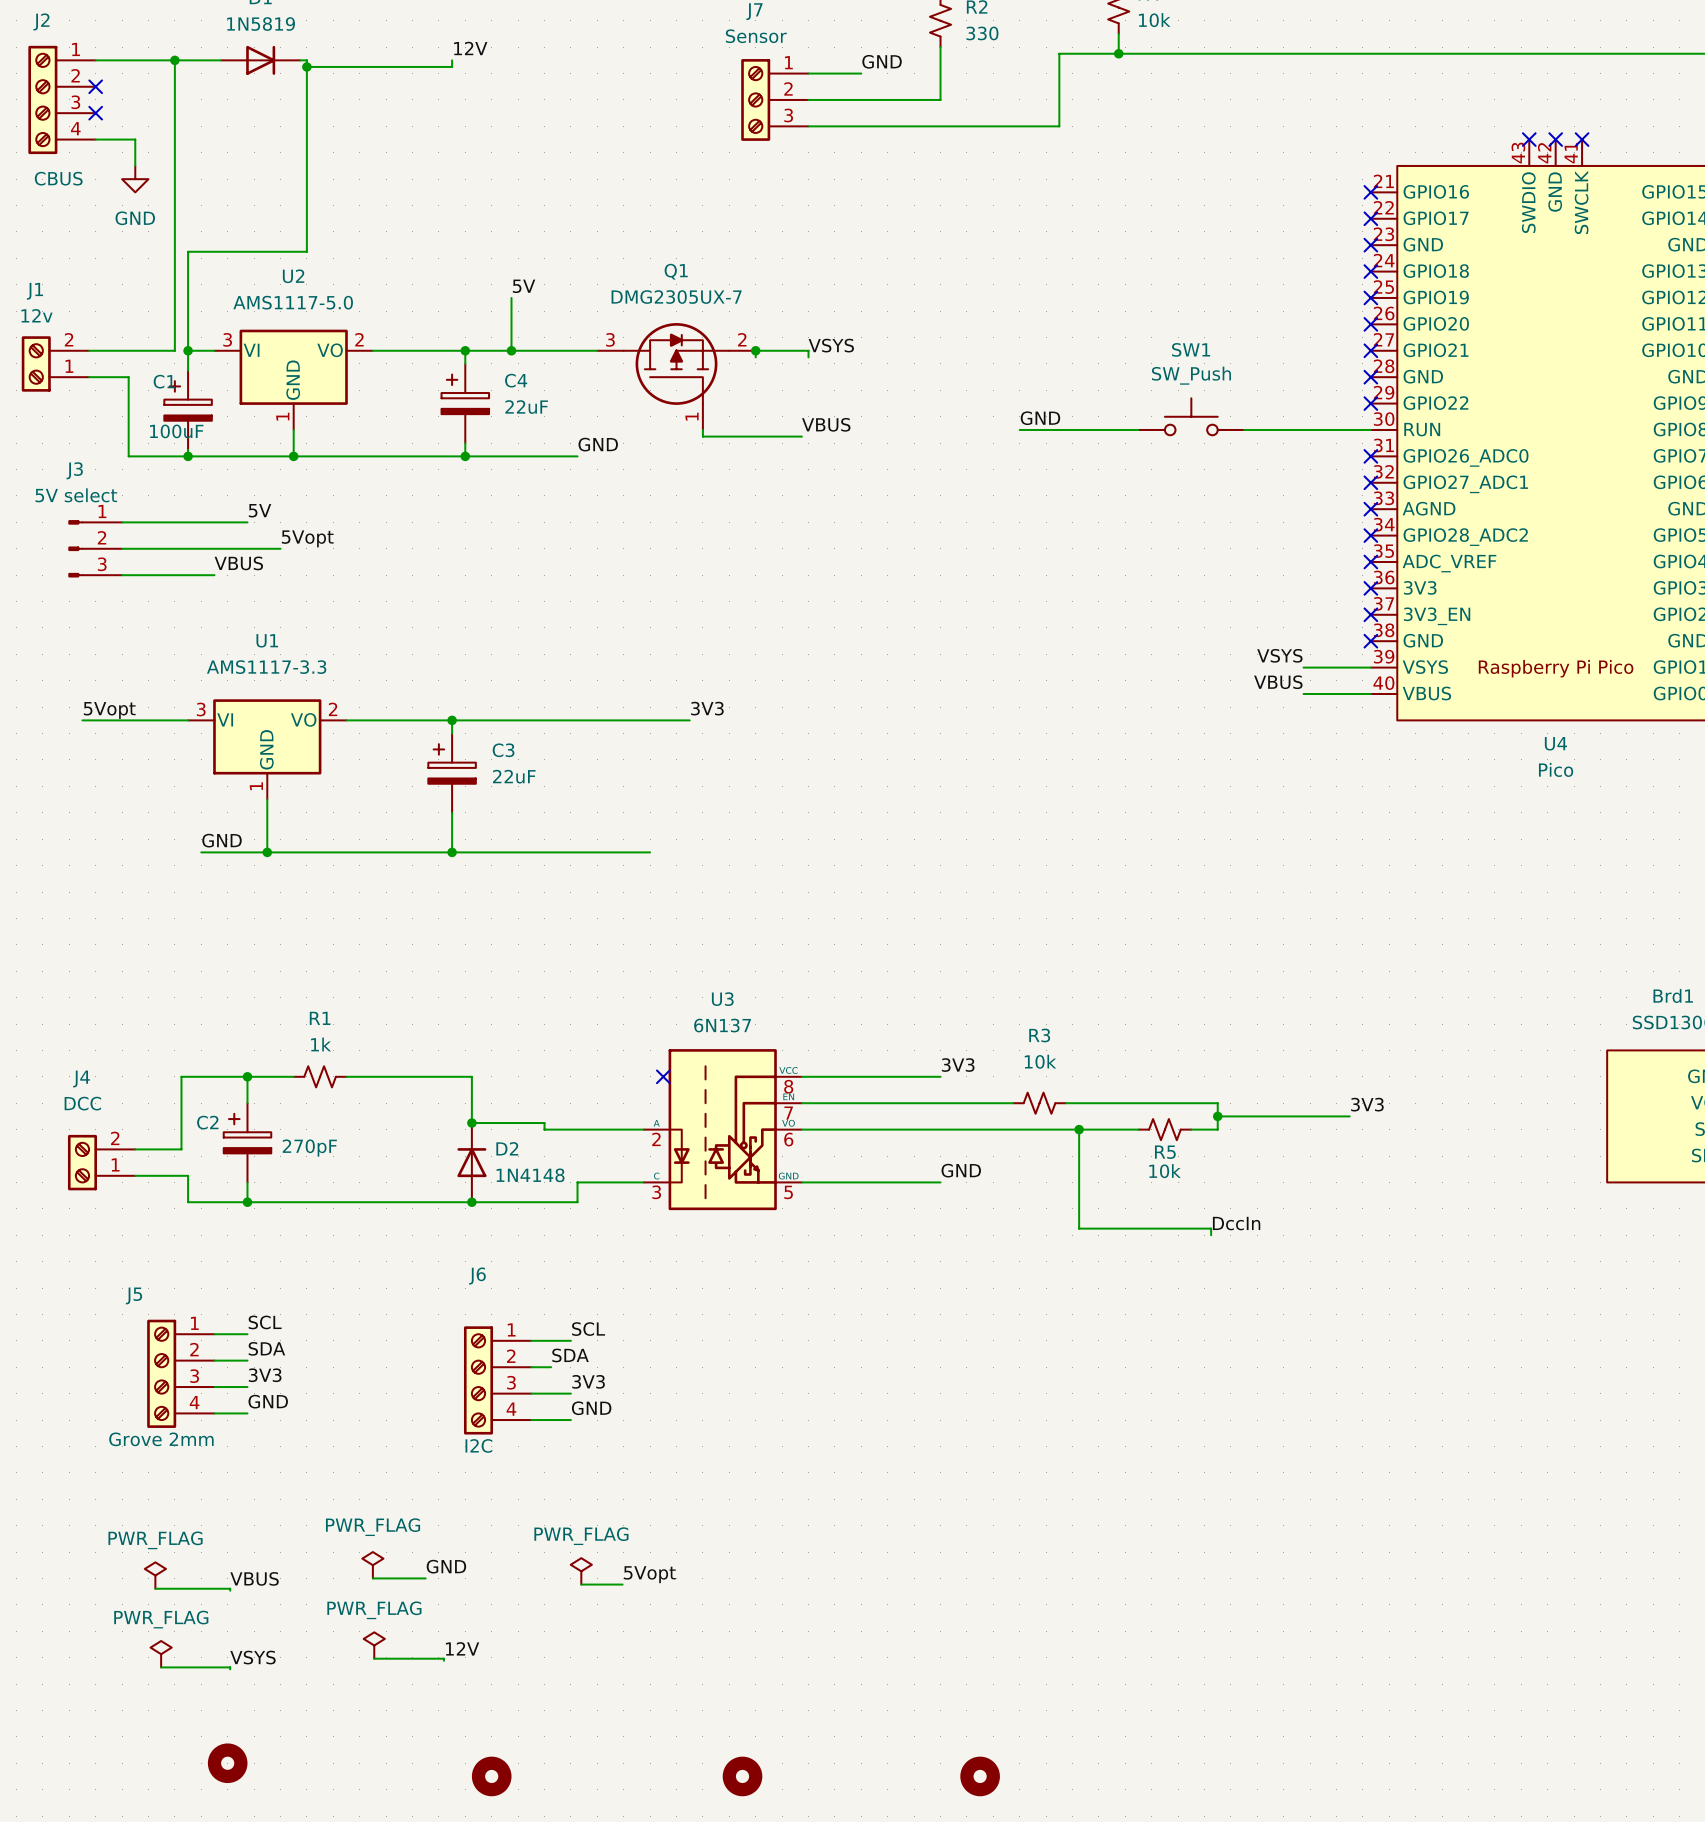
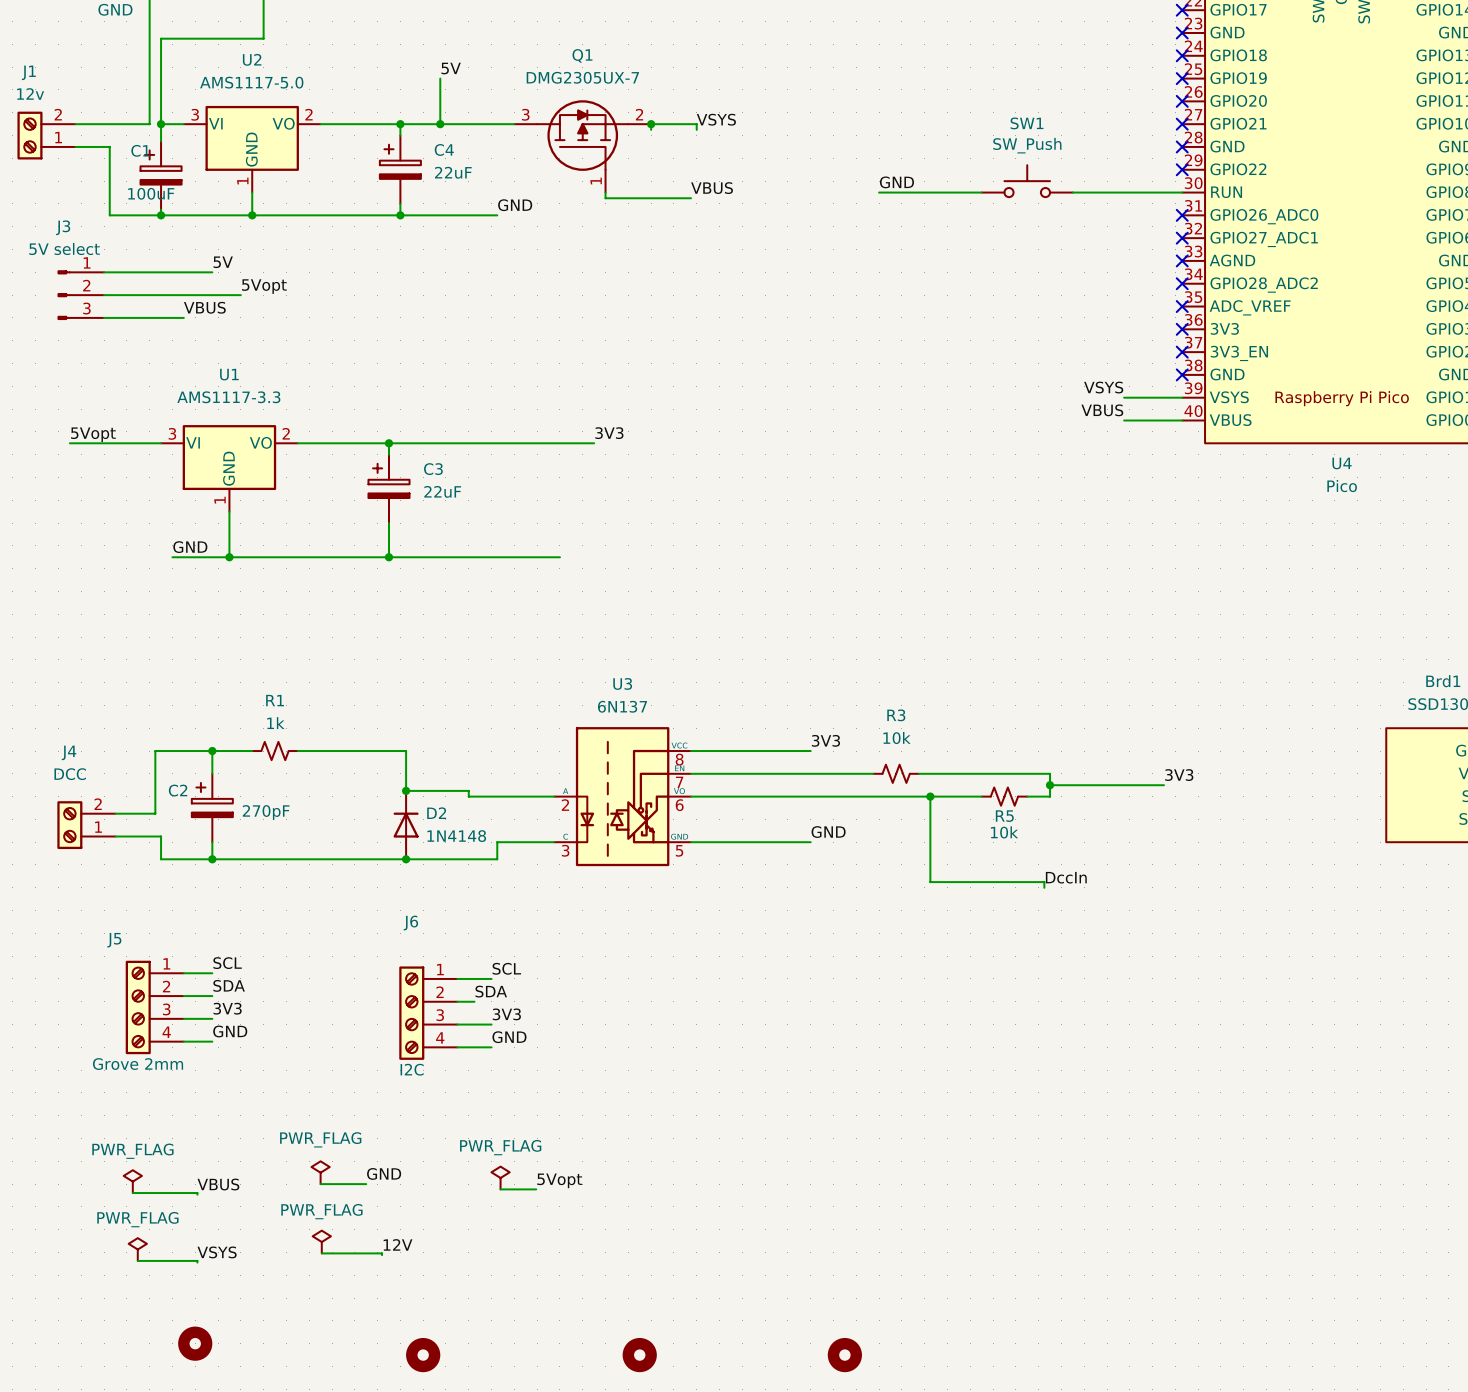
no-connect mark: (663, 1076) -> none

